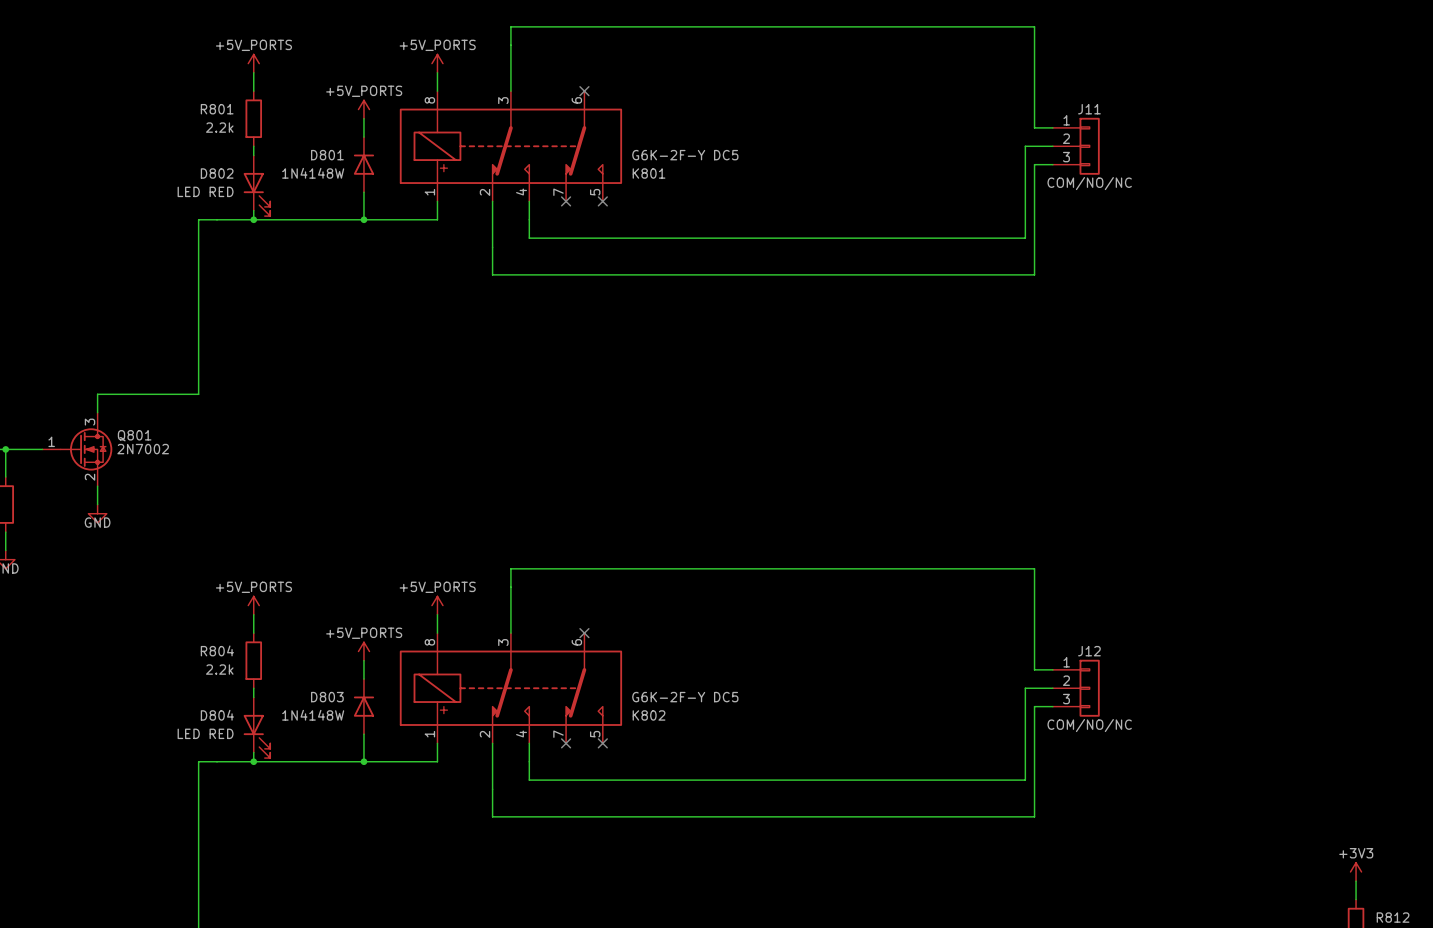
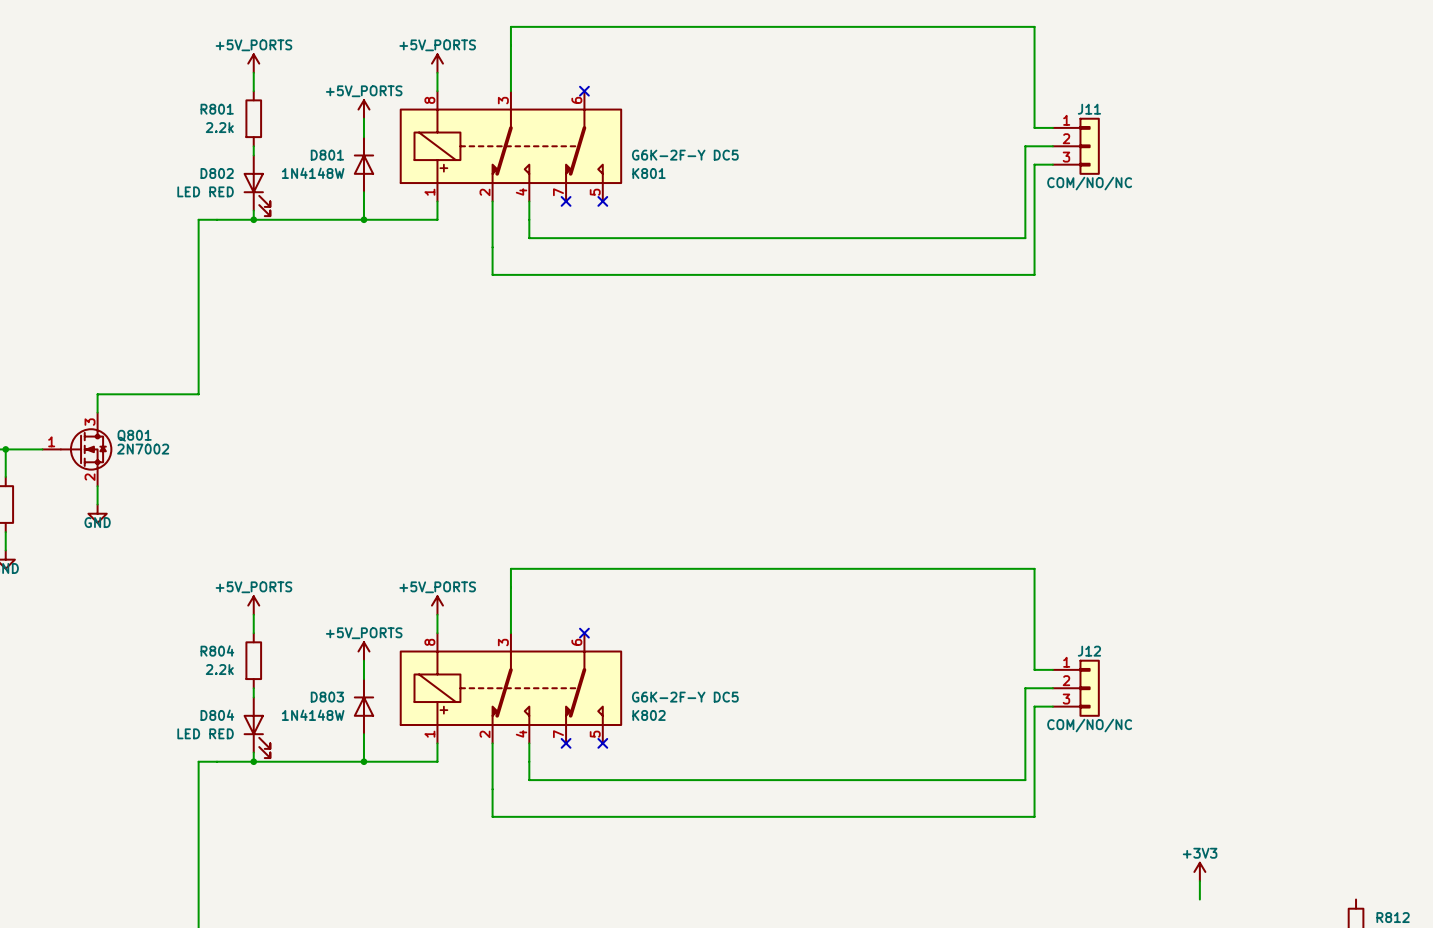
power symbol position: +3V3 (1356, 871) -> +3V3 (1199, 871)
wire: (1356, 881) (1356, 899) -> (1199, 881) (1199, 899)

